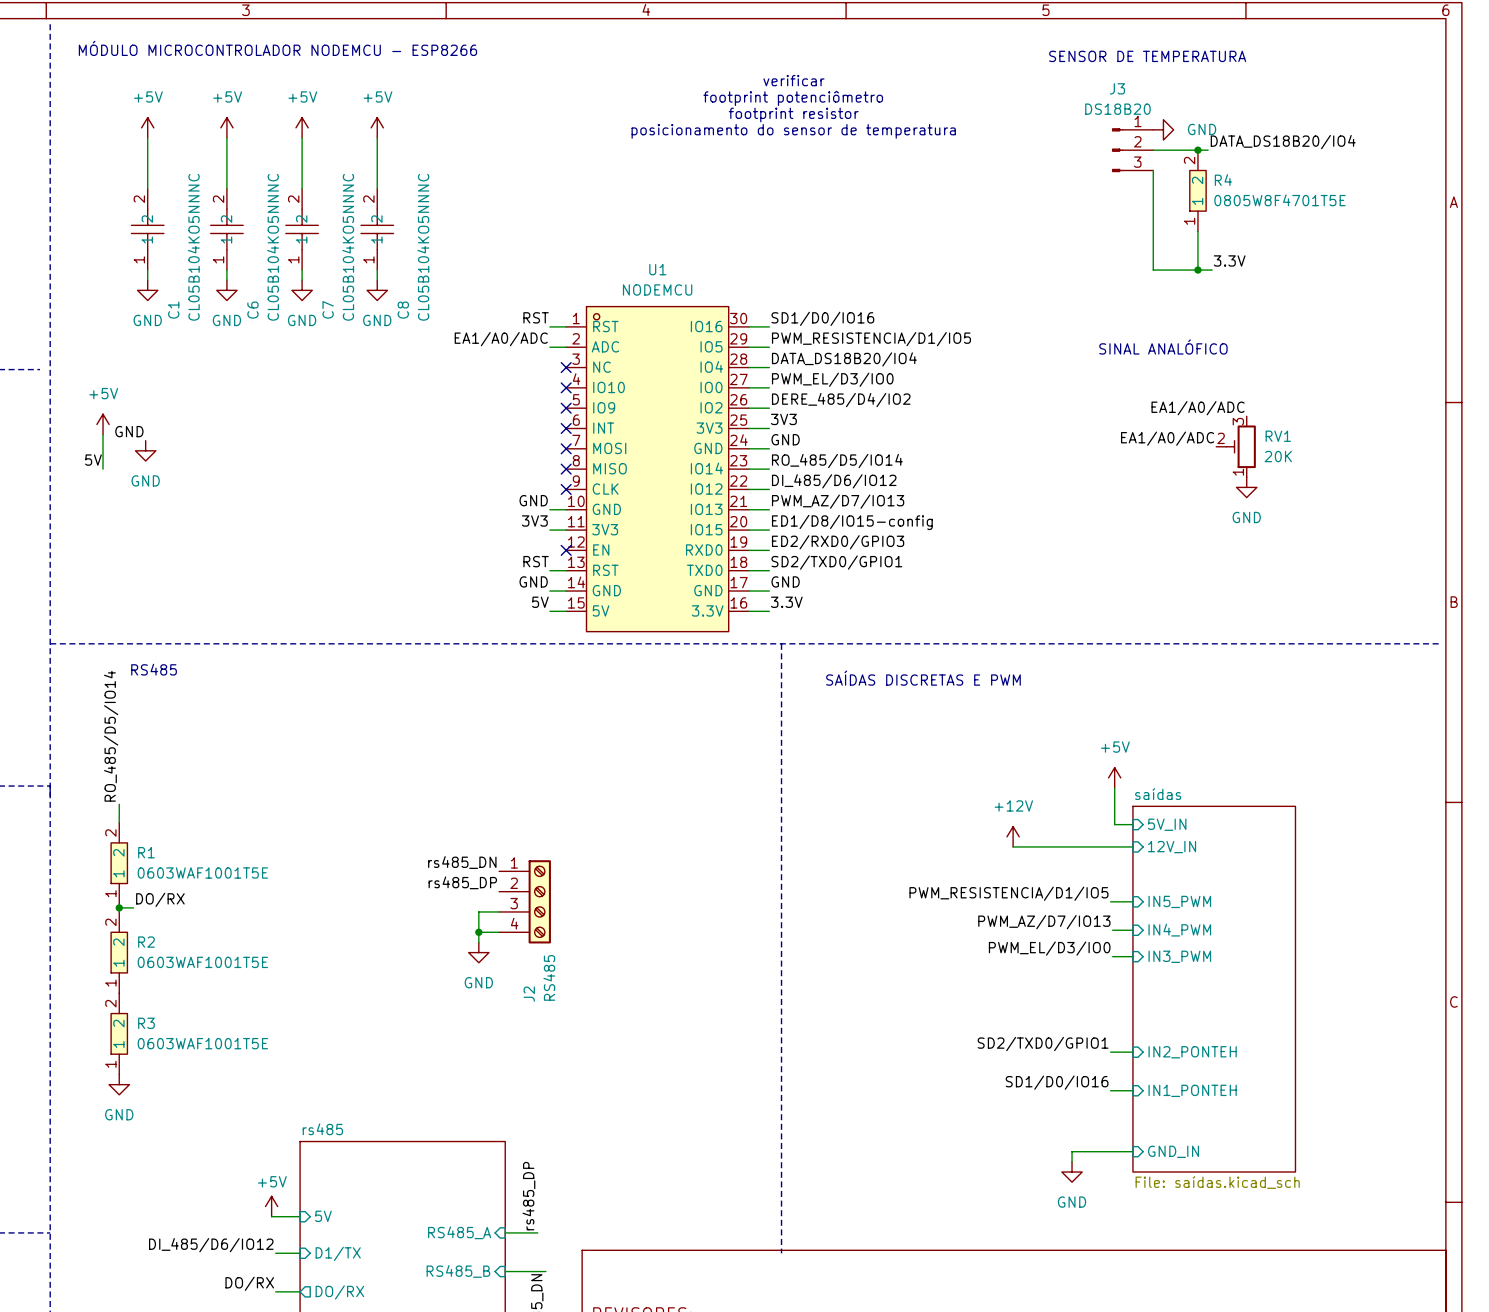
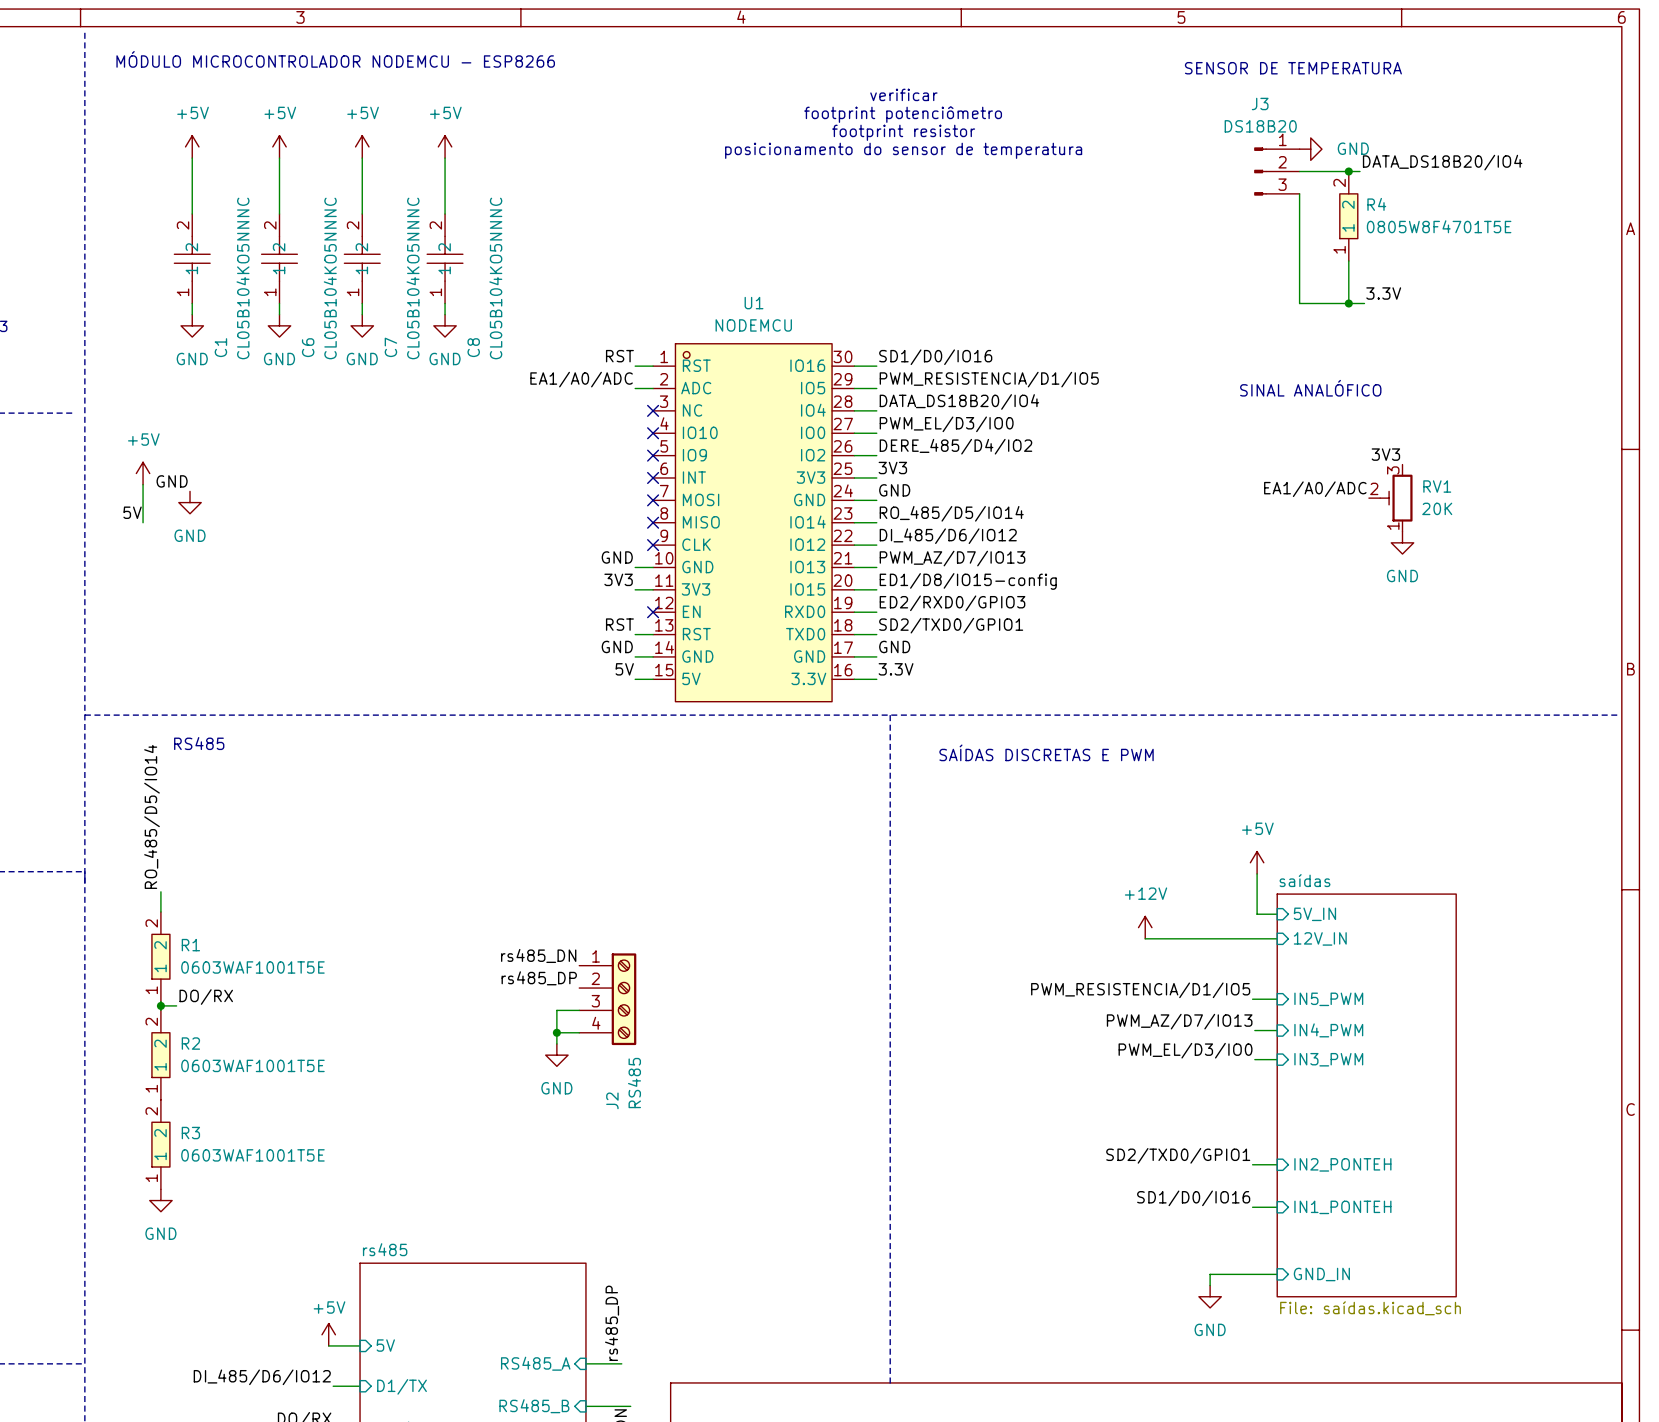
label: EA1/A0/ADC (1198, 408) -> 3V3 (1385, 454)

